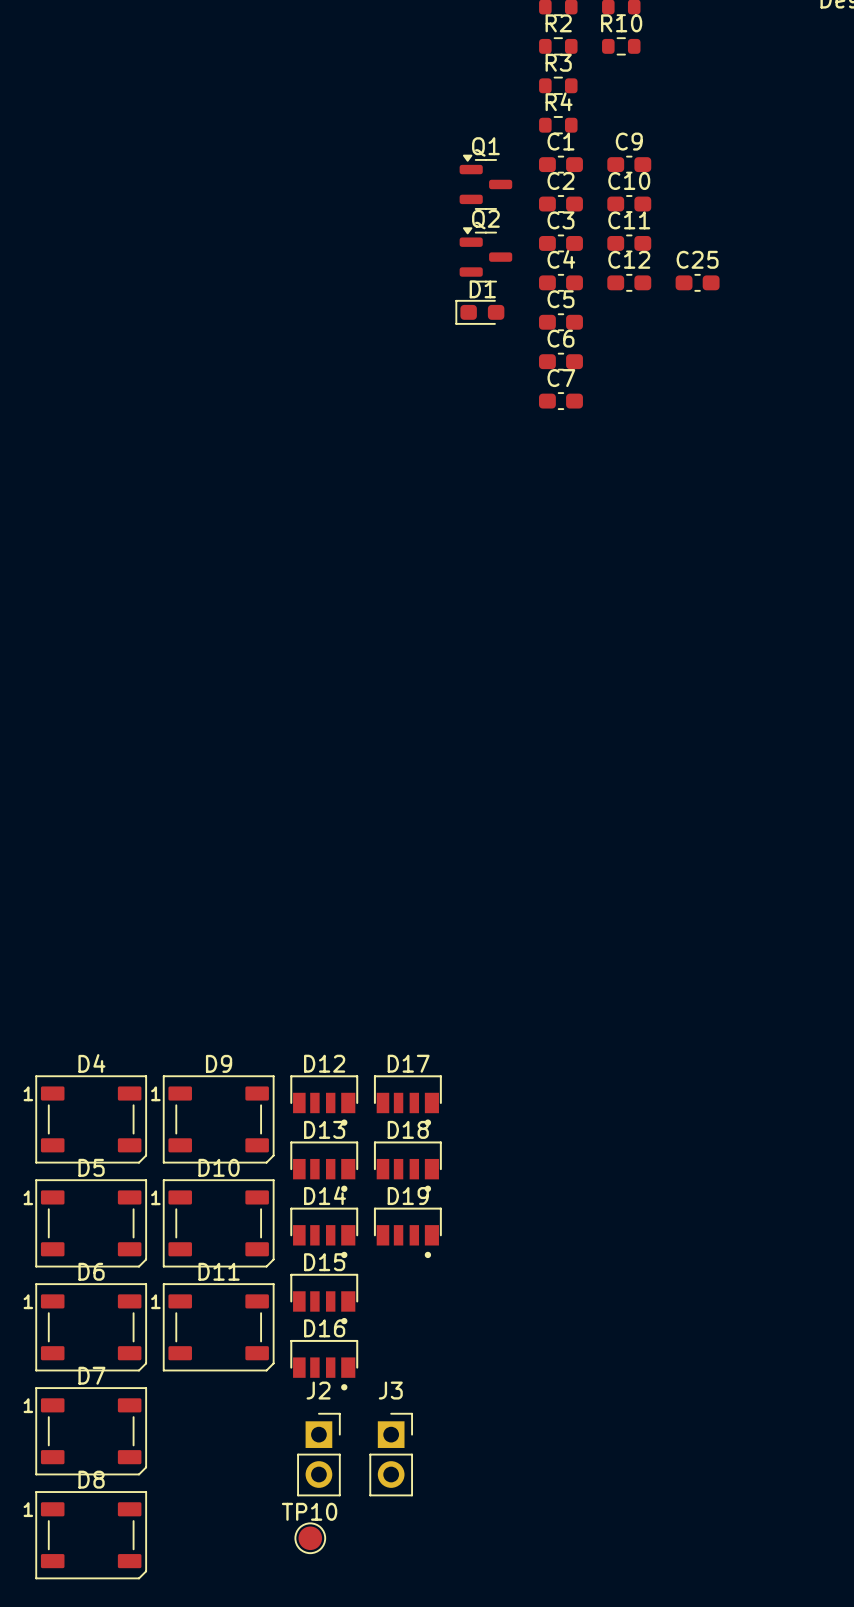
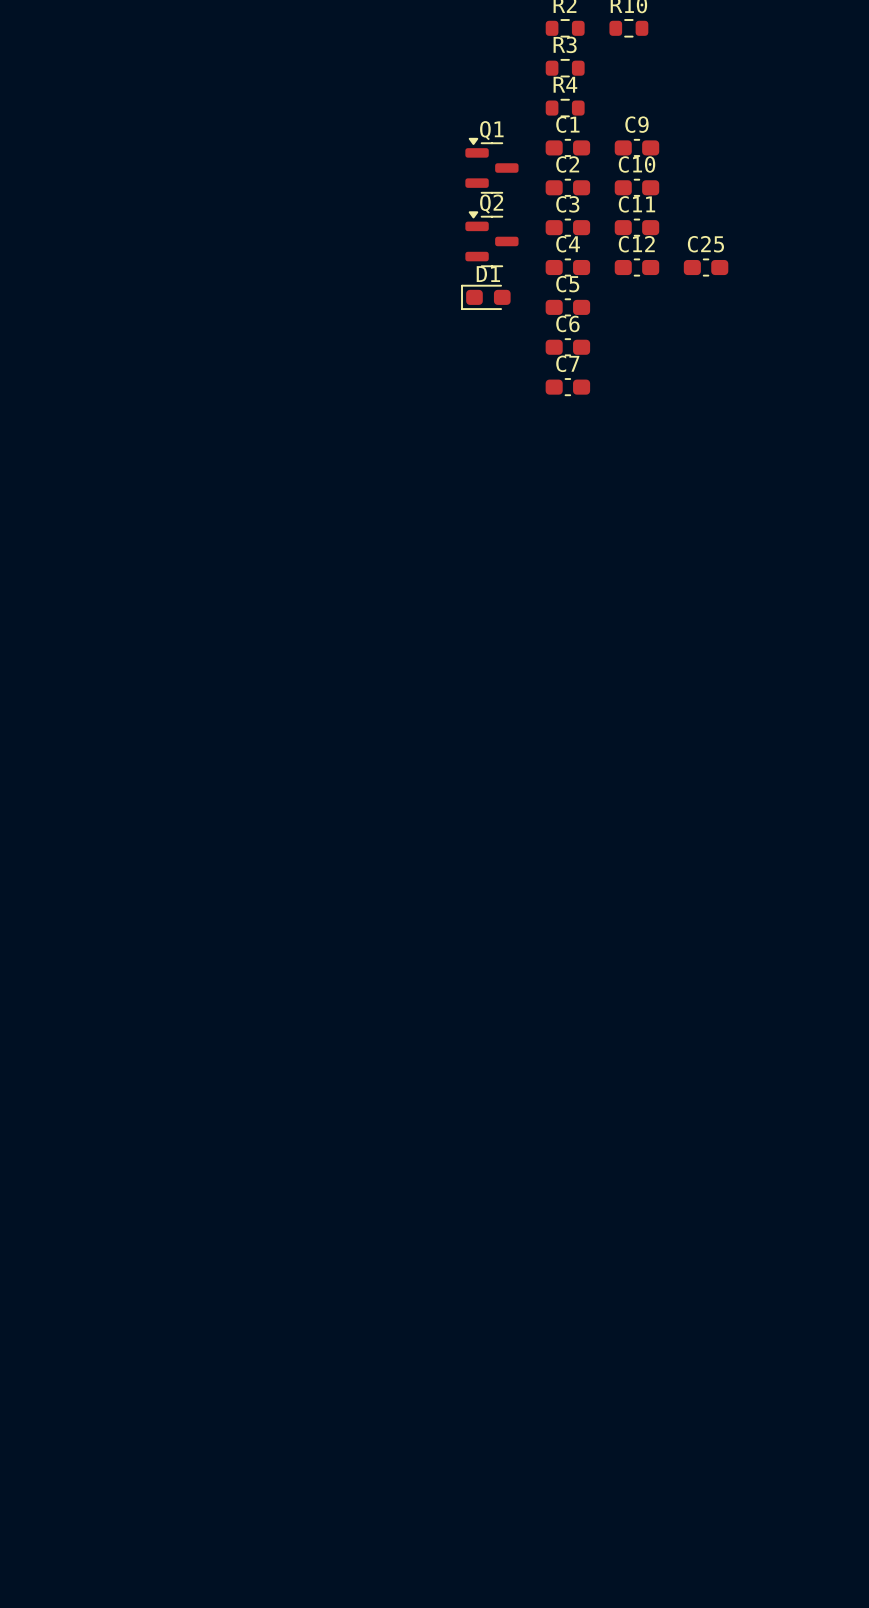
D12: (324, 1100) -> none
D17: (407, 1100) -> none
D4: (91, 1119) -> none
D9: (218, 1119) -> none
D13: (324, 1166) -> none
D18: (407, 1166) -> none
D5: (91, 1223) -> none
D10: (218, 1223) -> none
D14: (324, 1232) -> none
D19: (407, 1232) -> none
D15: (324, 1299) -> none
D6: (91, 1327) -> none
D11: (218, 1327) -> none
D16: (324, 1365) -> none
D7: (91, 1431) -> none
J2: (318, 1454) -> none
J3: (391, 1454) -> none
D8: (91, 1535) -> none
TP10: (310, 1538) -> none

